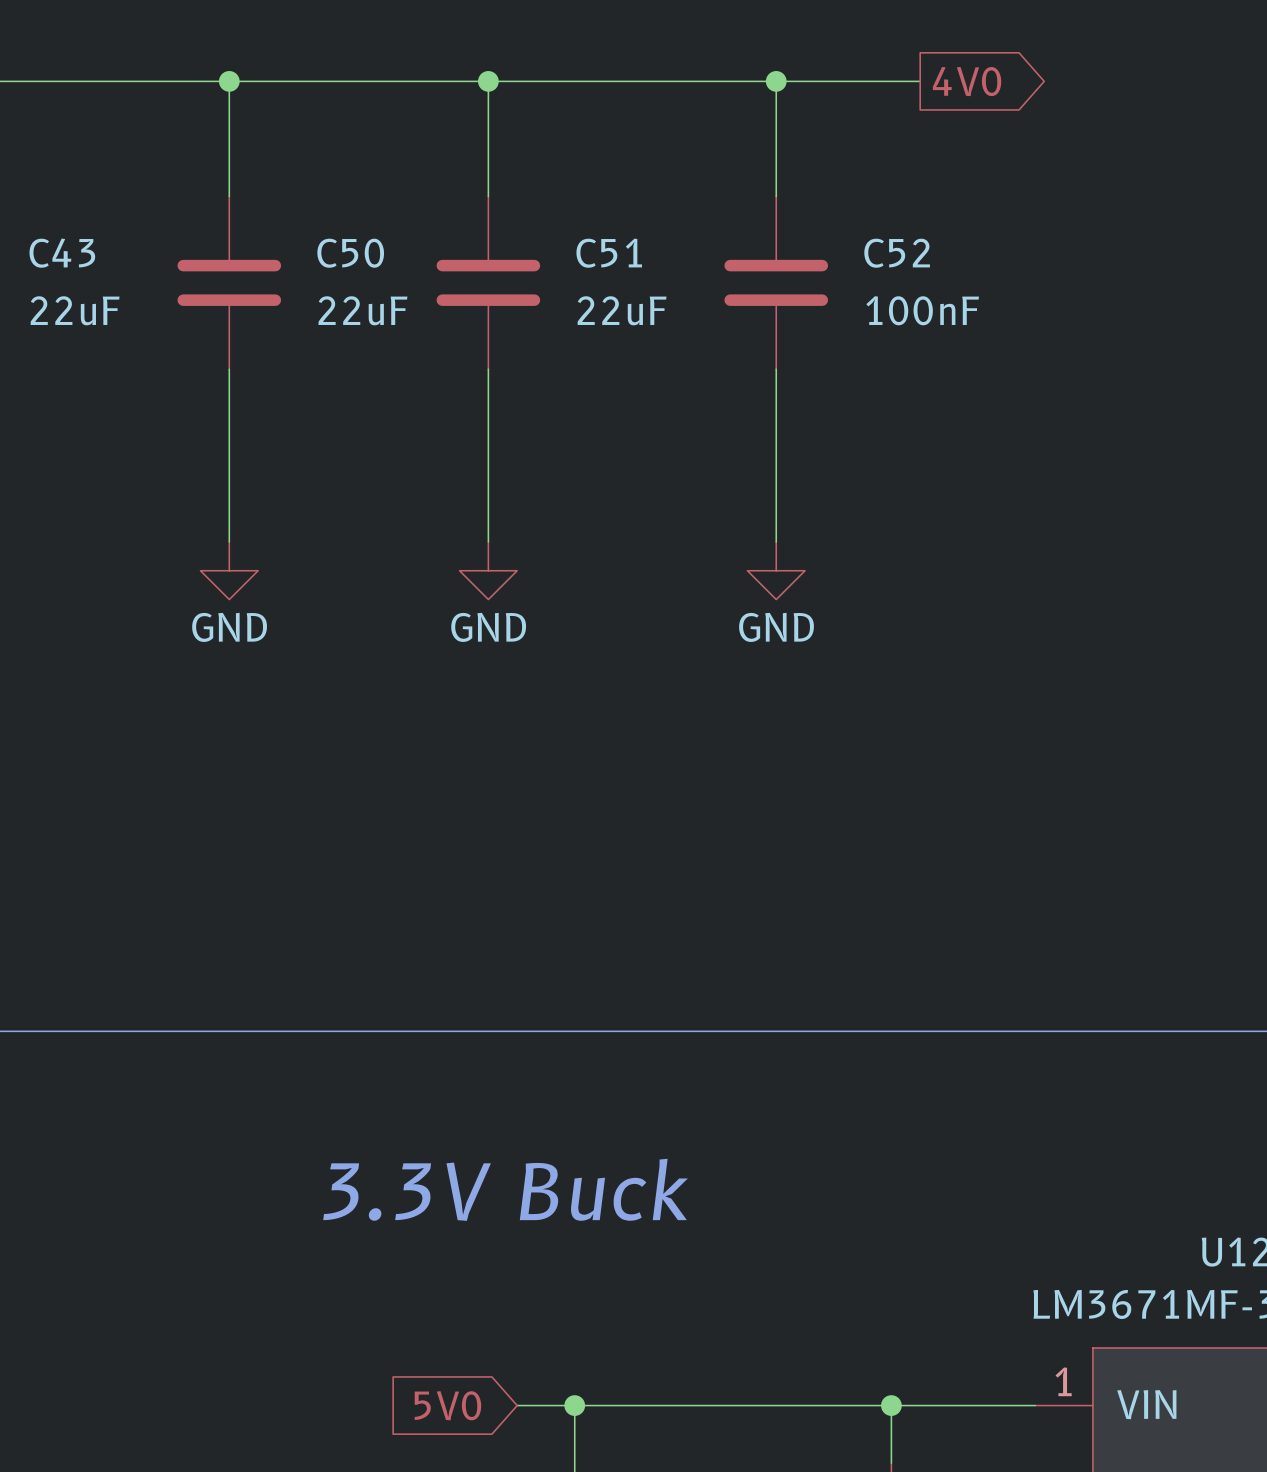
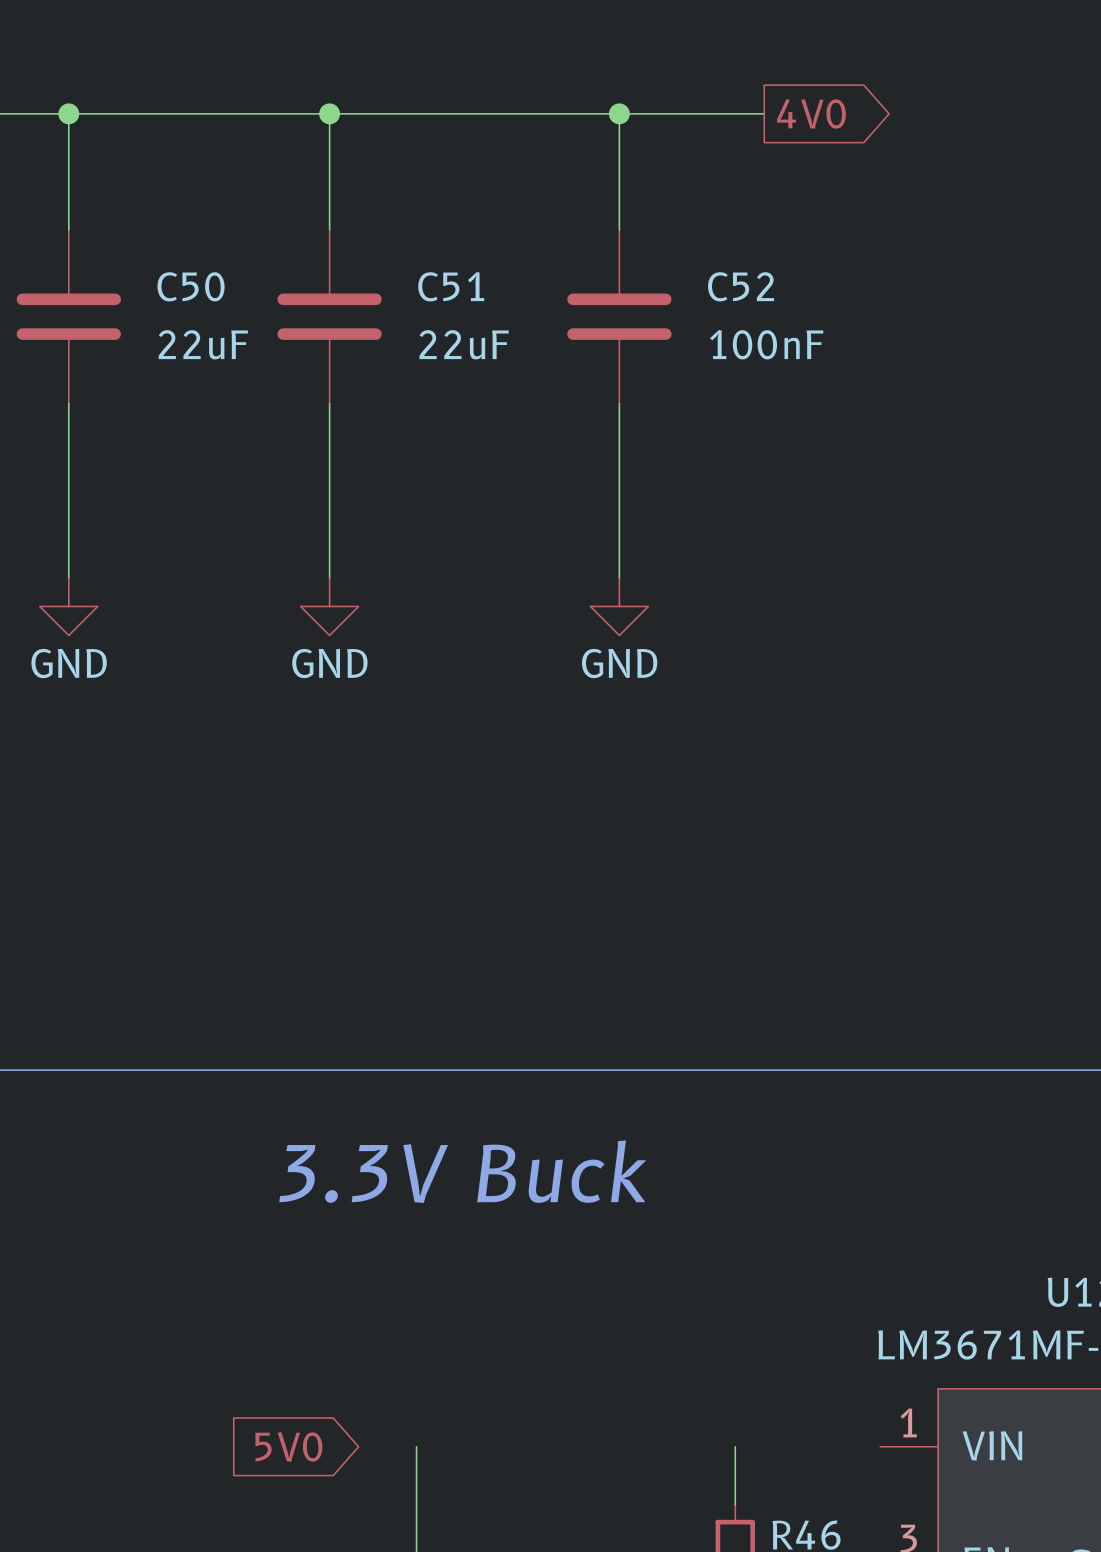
text position: 3.3V Buck (505, 1189) -> 3.3V Buck (462, 1171)
wire: (517, 1405) (1035, 1405) -> none
junction: (574, 1405) -> none
junction: (891, 1405) -> none

